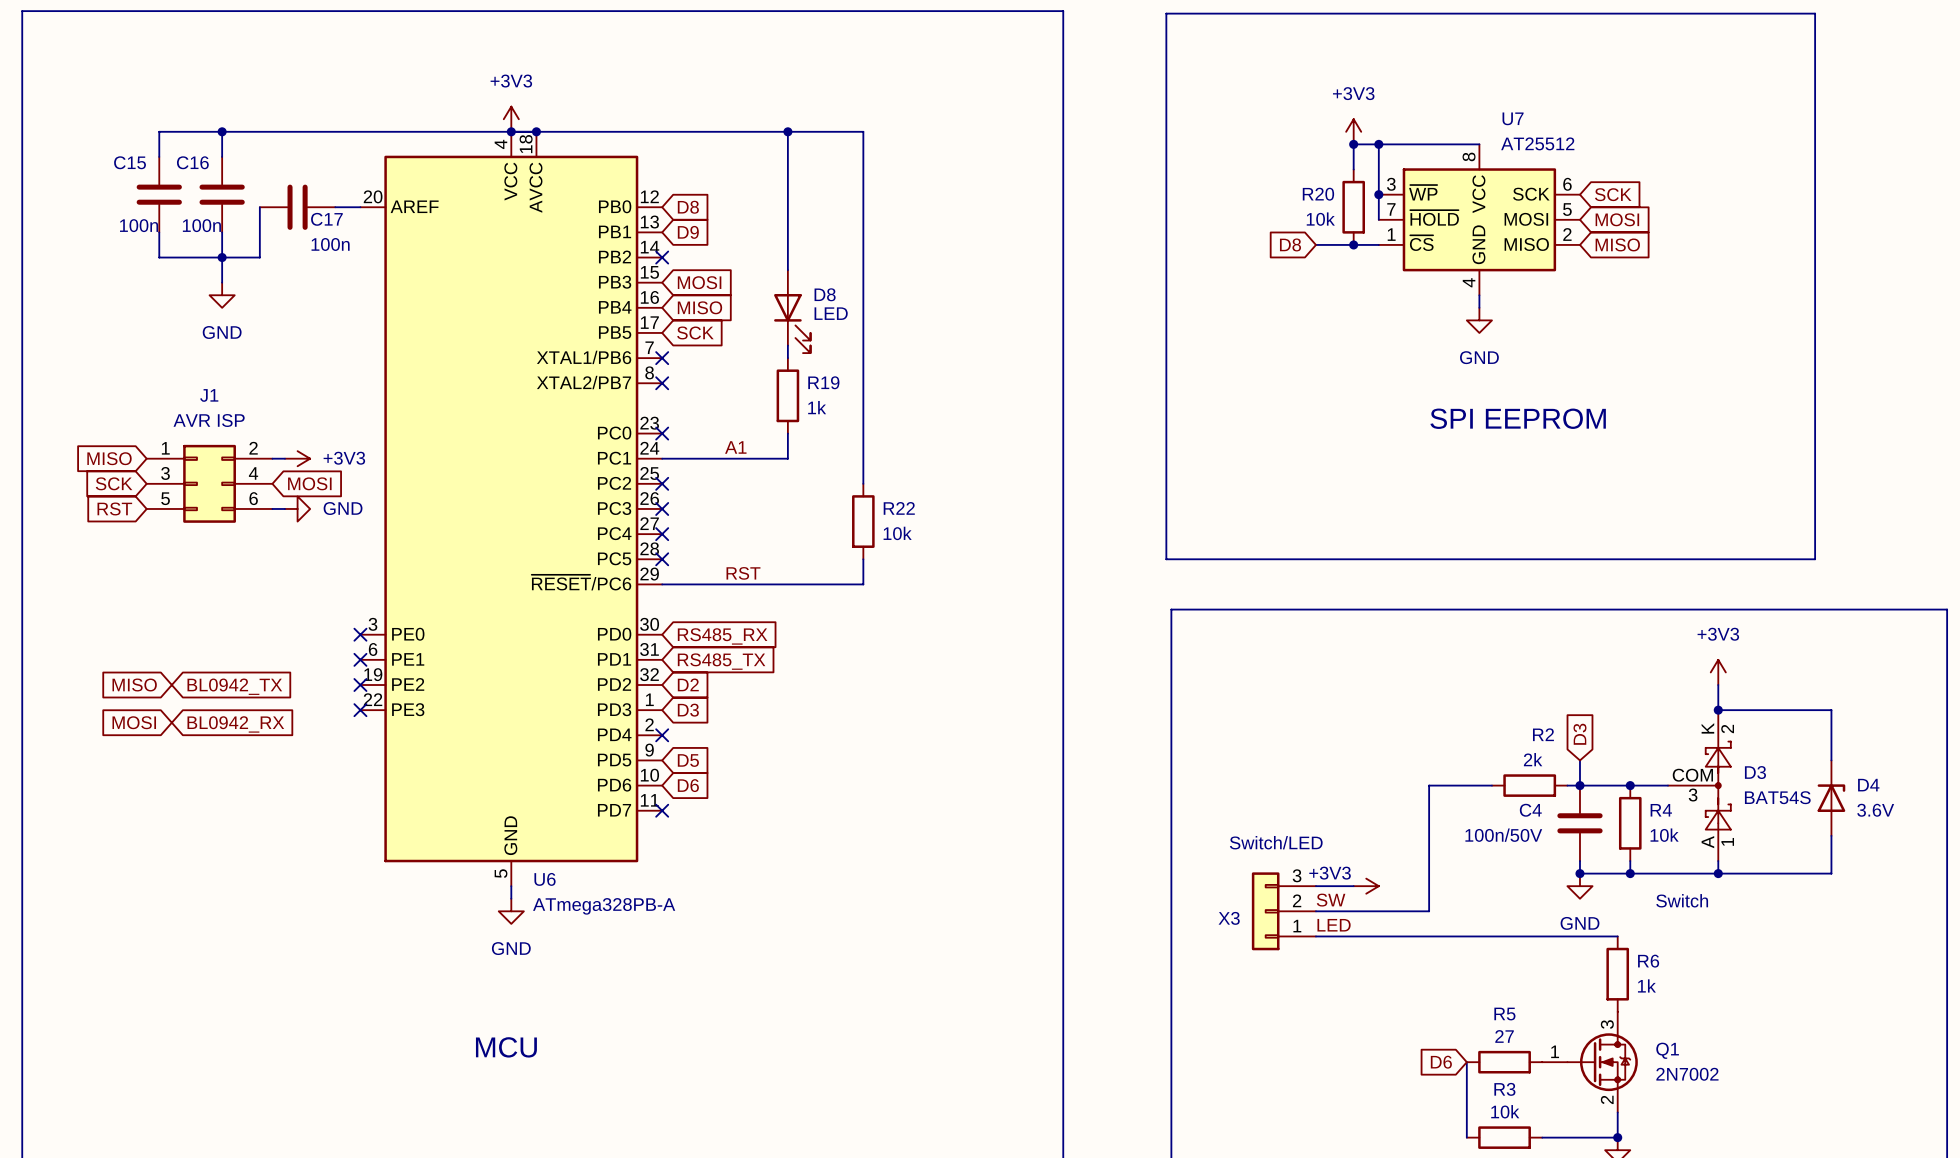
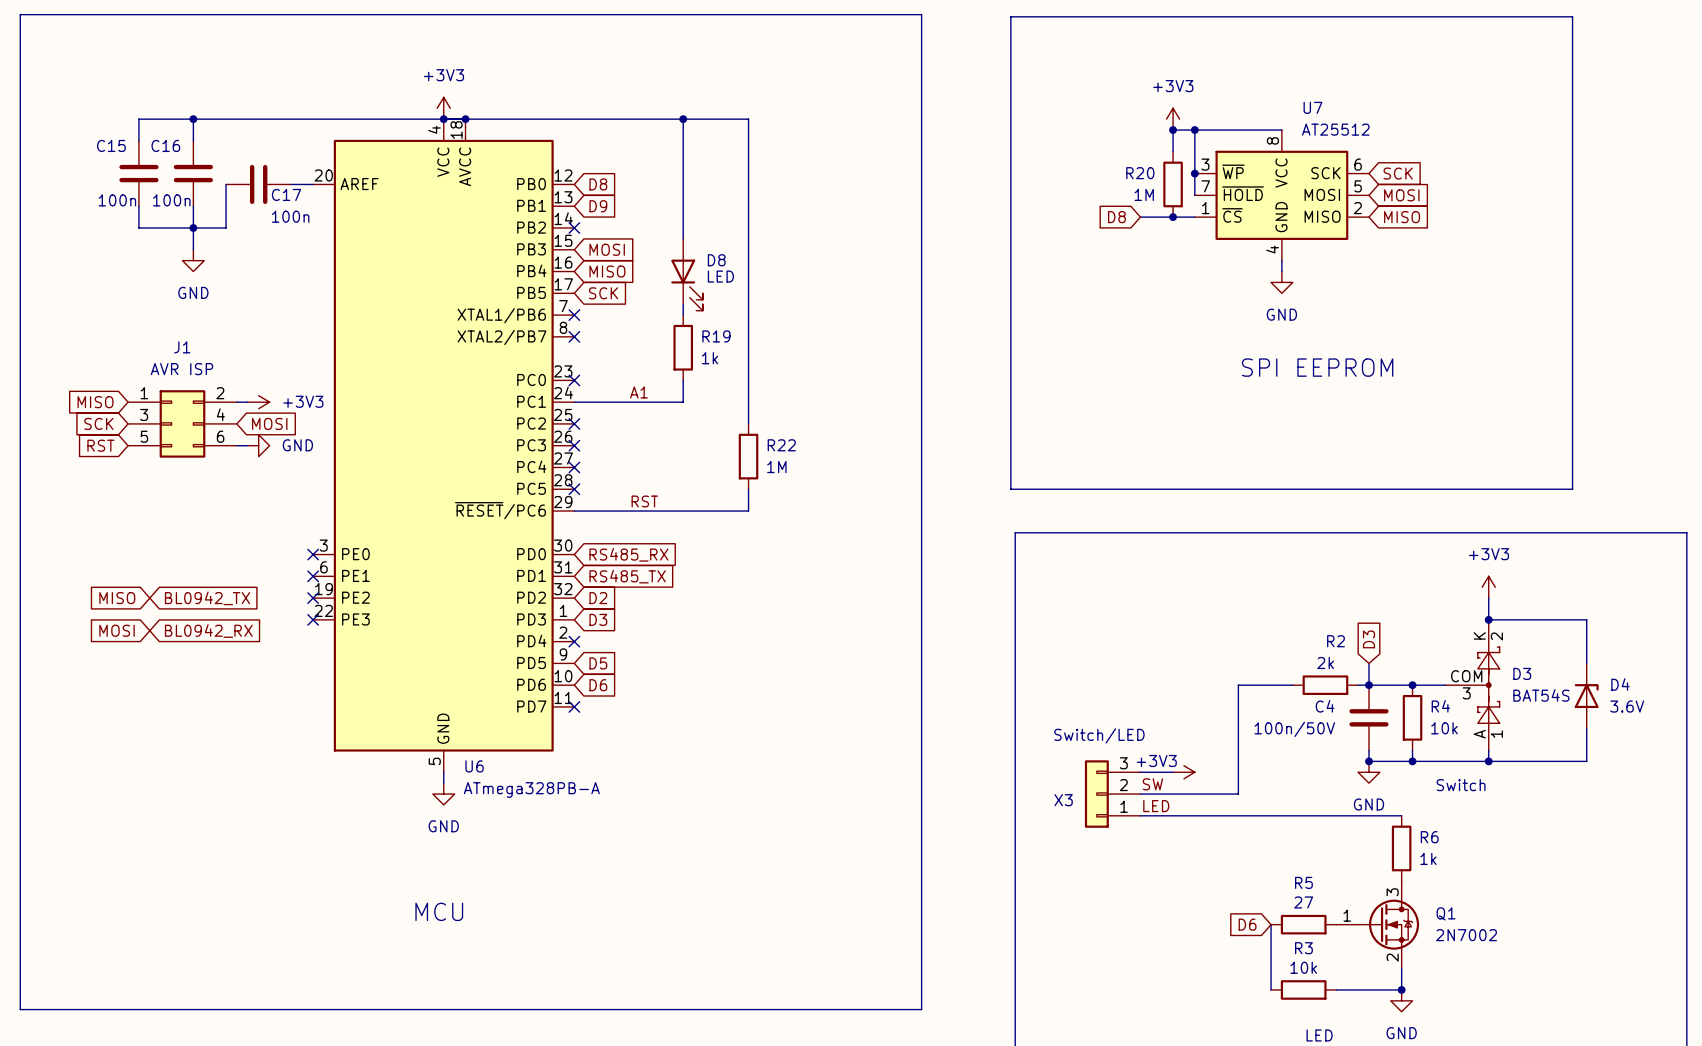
R20 value: 10k (1320, 219) -> 1M (1144, 194)
R22 value: 10k (897, 533) -> 1M (776, 467)

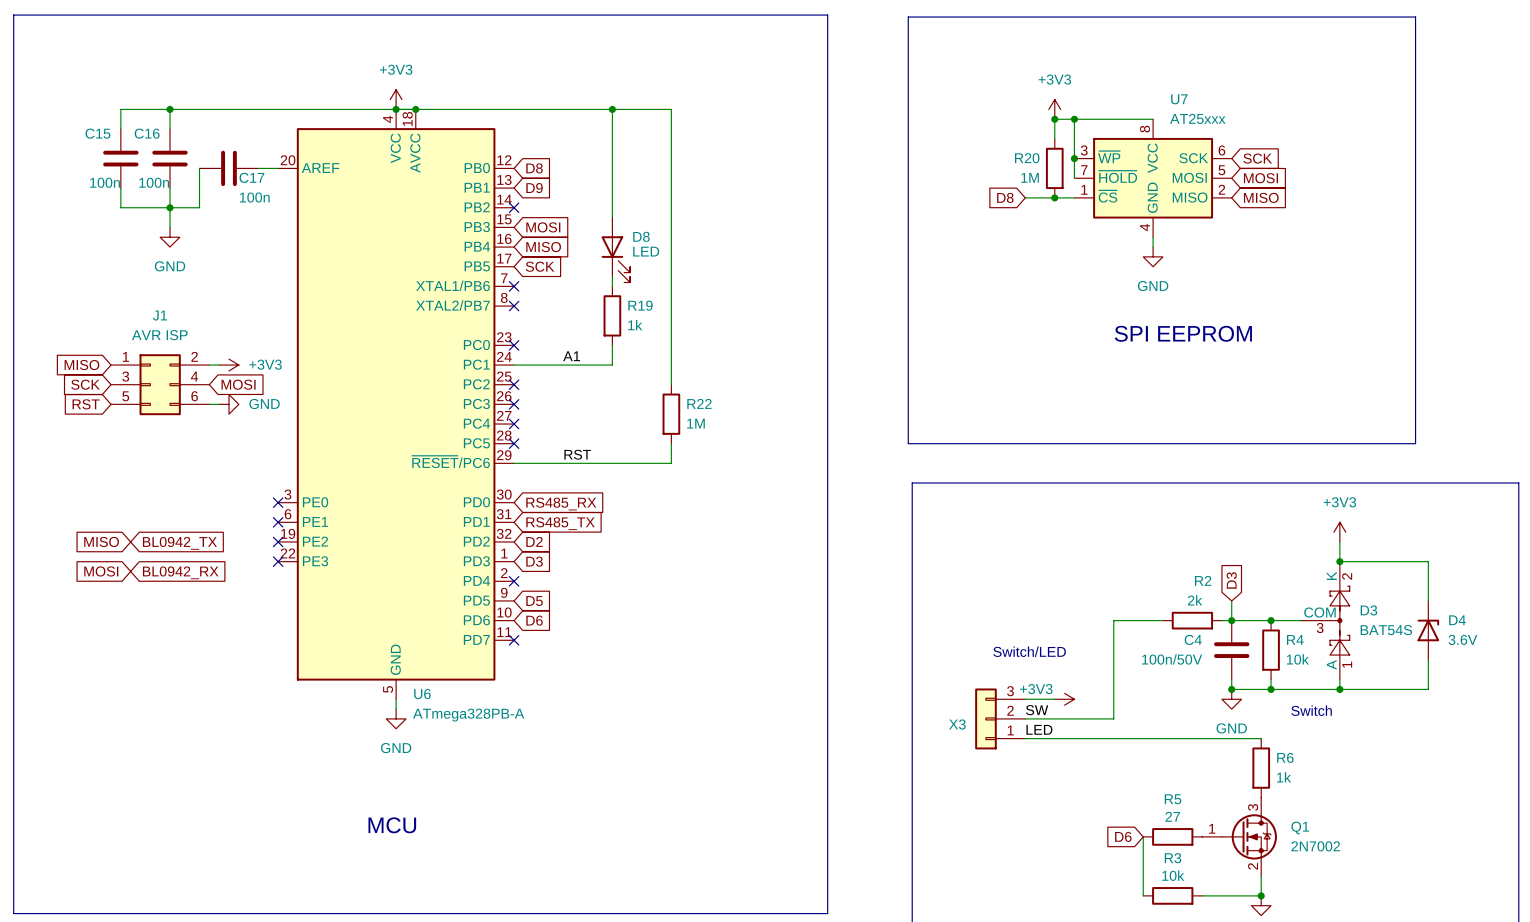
U7 value: AT25512 (1335, 129) -> AT25xxx (1197, 118)
text: none -> Switch/LED (1029, 651)
X3 value: Switch/LED (1099, 735) -> none

